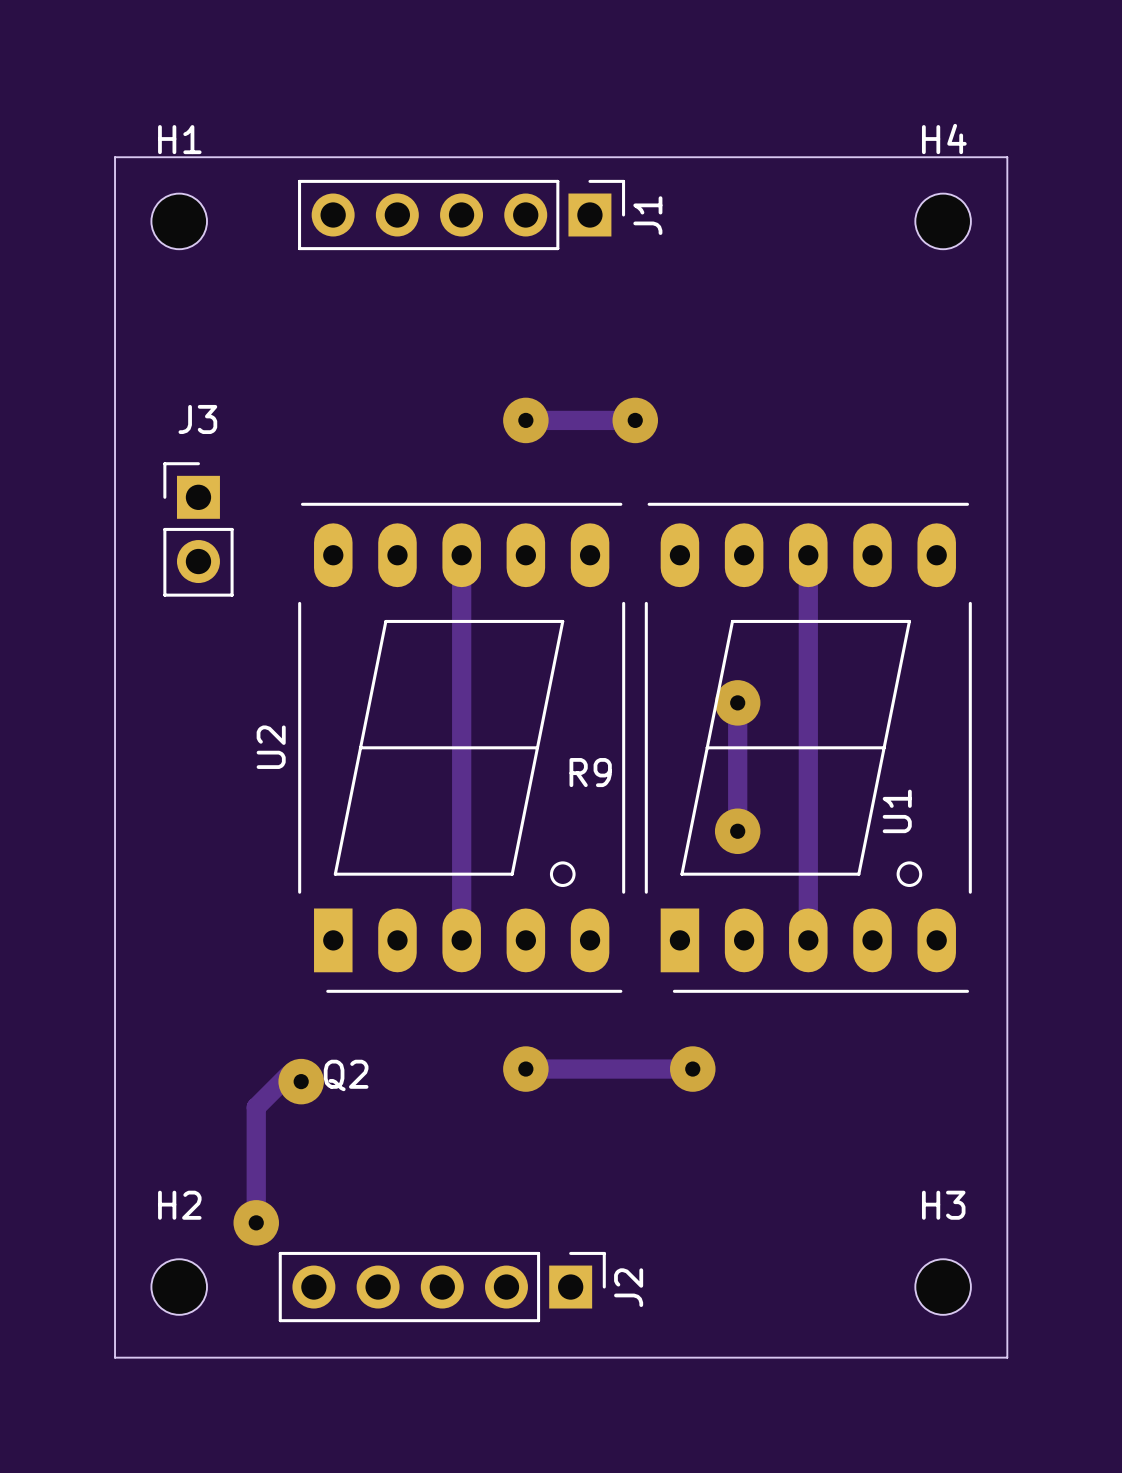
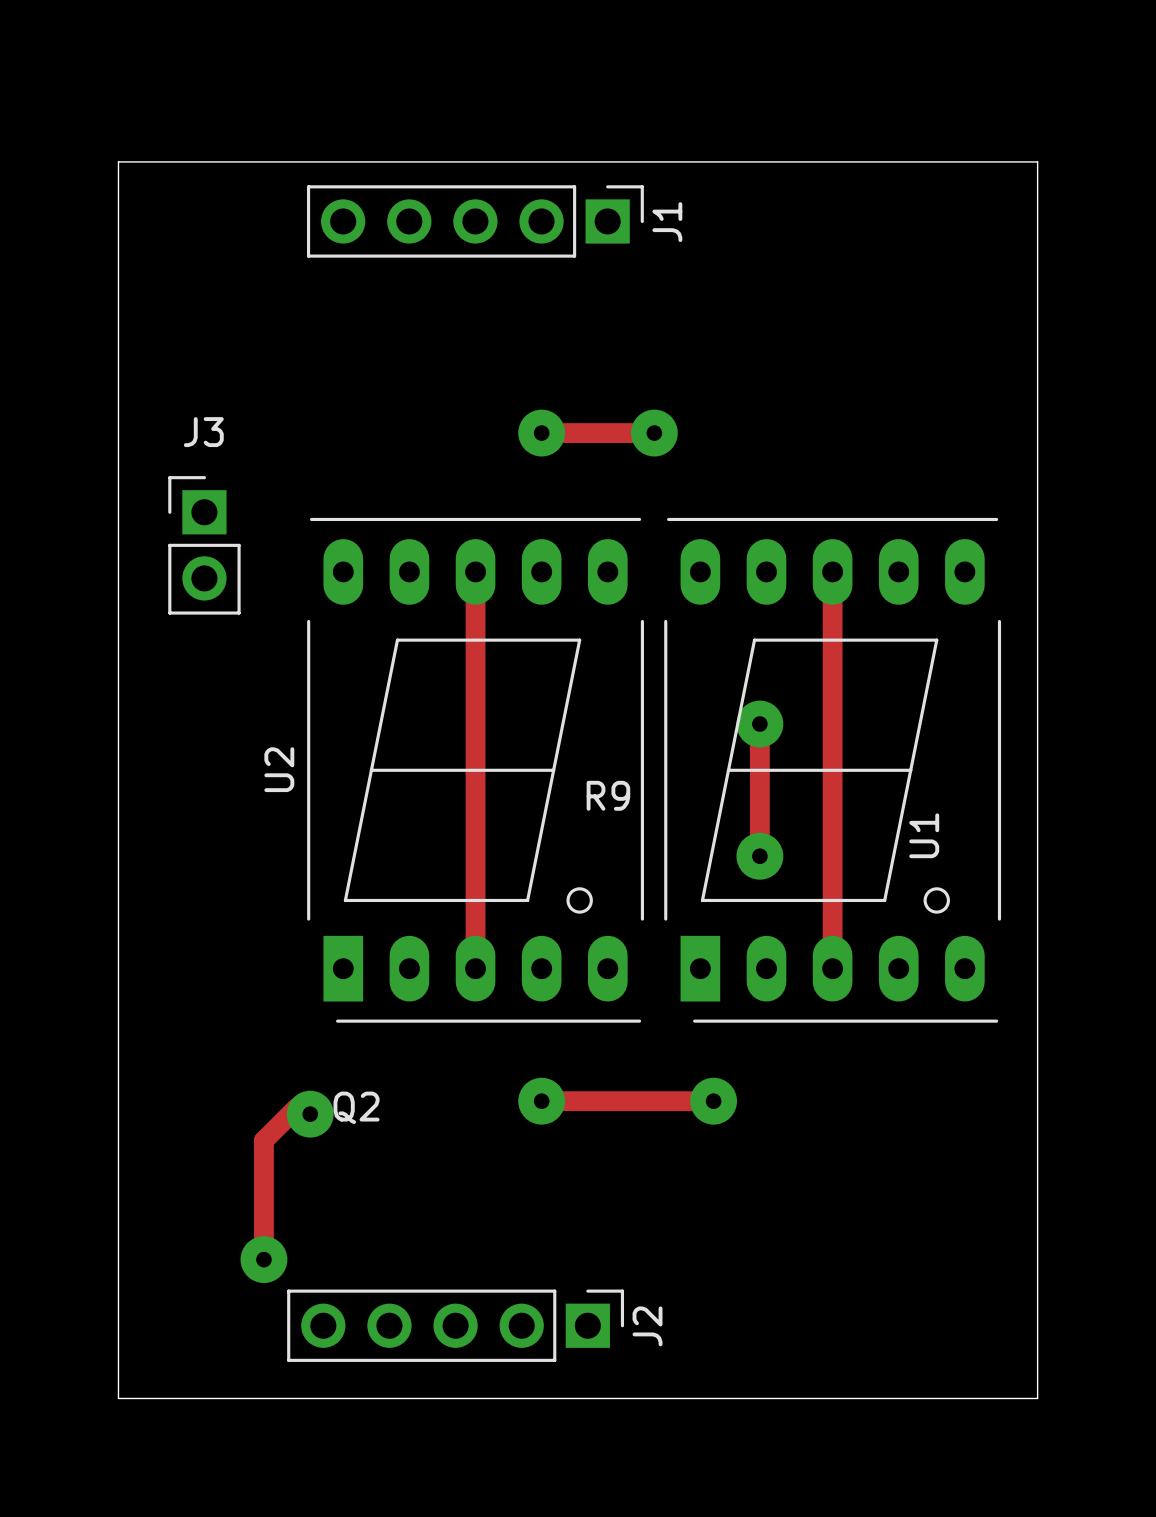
H1: (179, 221) -> none
H4: (943, 221) -> none
H2: (179, 1287) -> none
H3: (943, 1287) -> none

